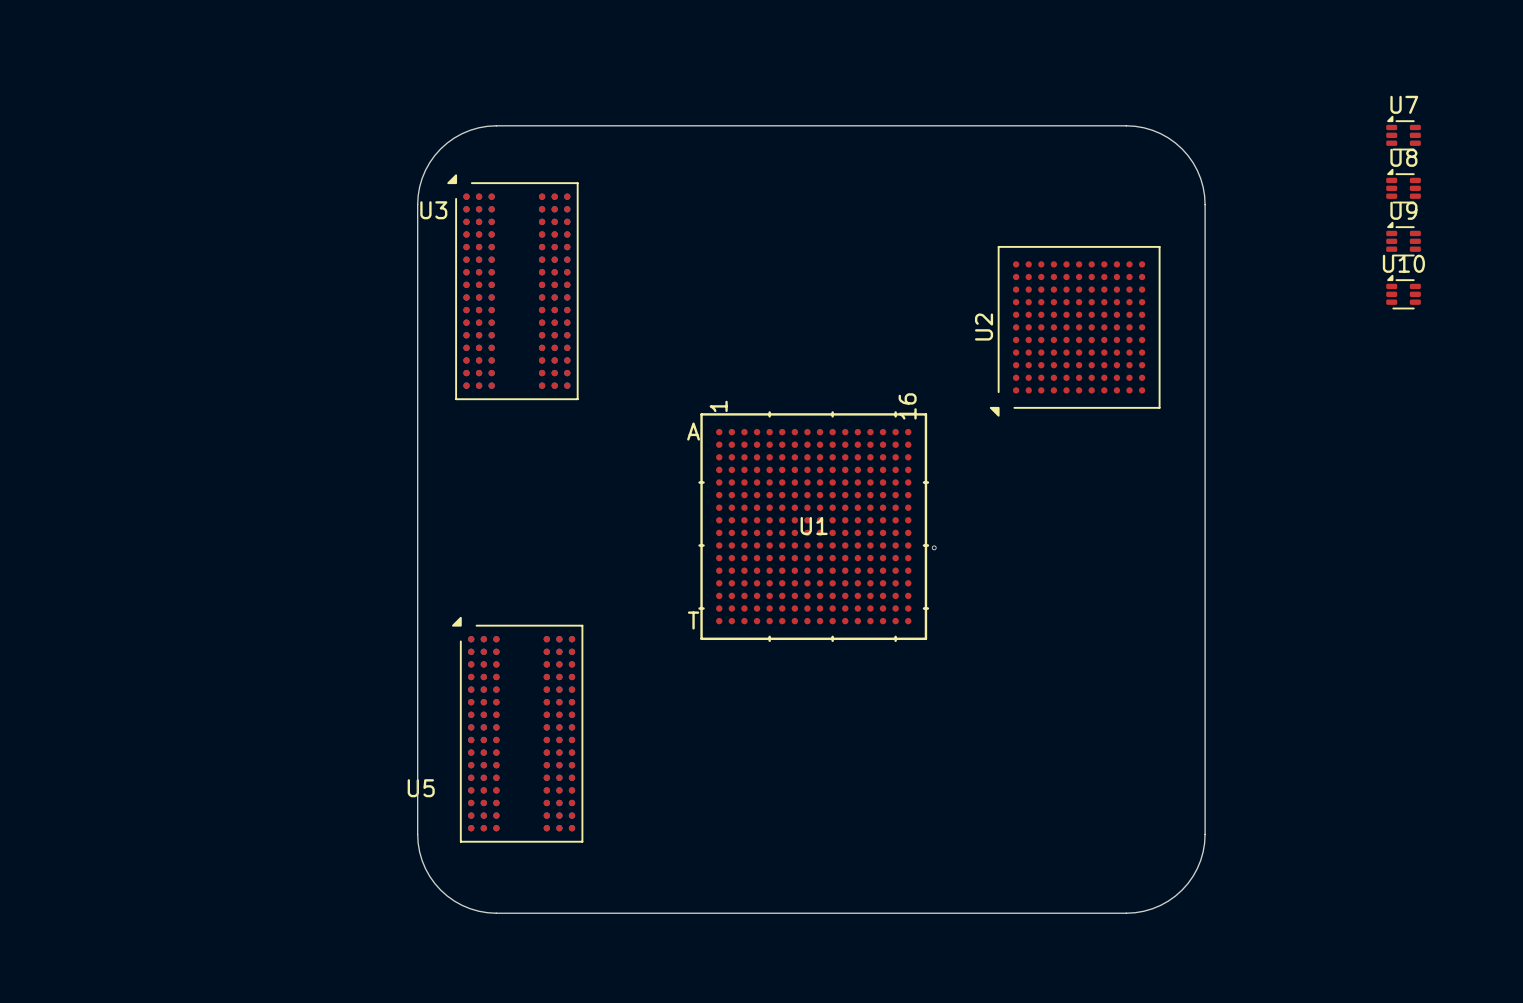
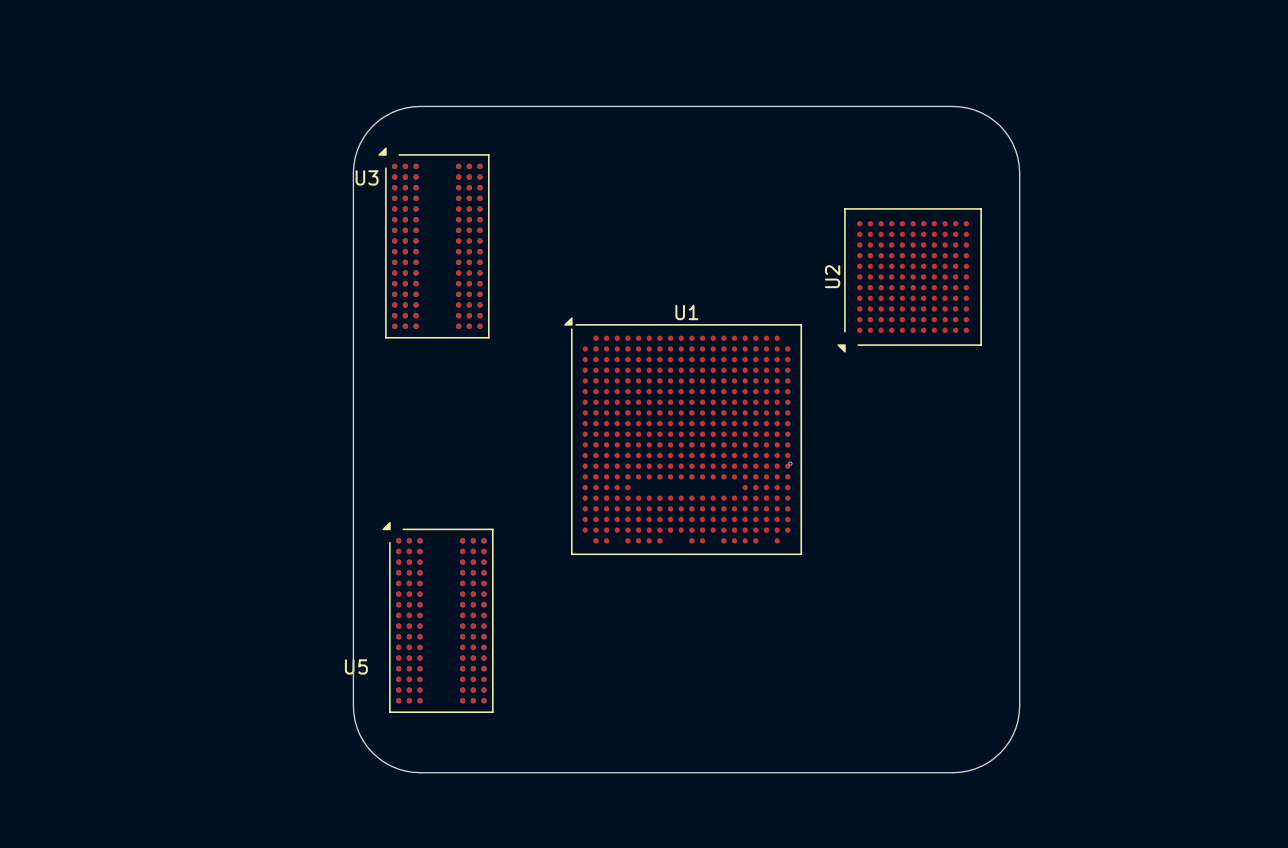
U7: (1403, 133) -> none
U8: (1403, 186) -> none
U9: (1403, 239) -> none
U10: (1403, 292) -> none
U1 footprint: [698, 411, 930, 643] -> [564, 317, 803, 556]
U1 name position: U1 (814, 526) -> U1 (686, 312)

